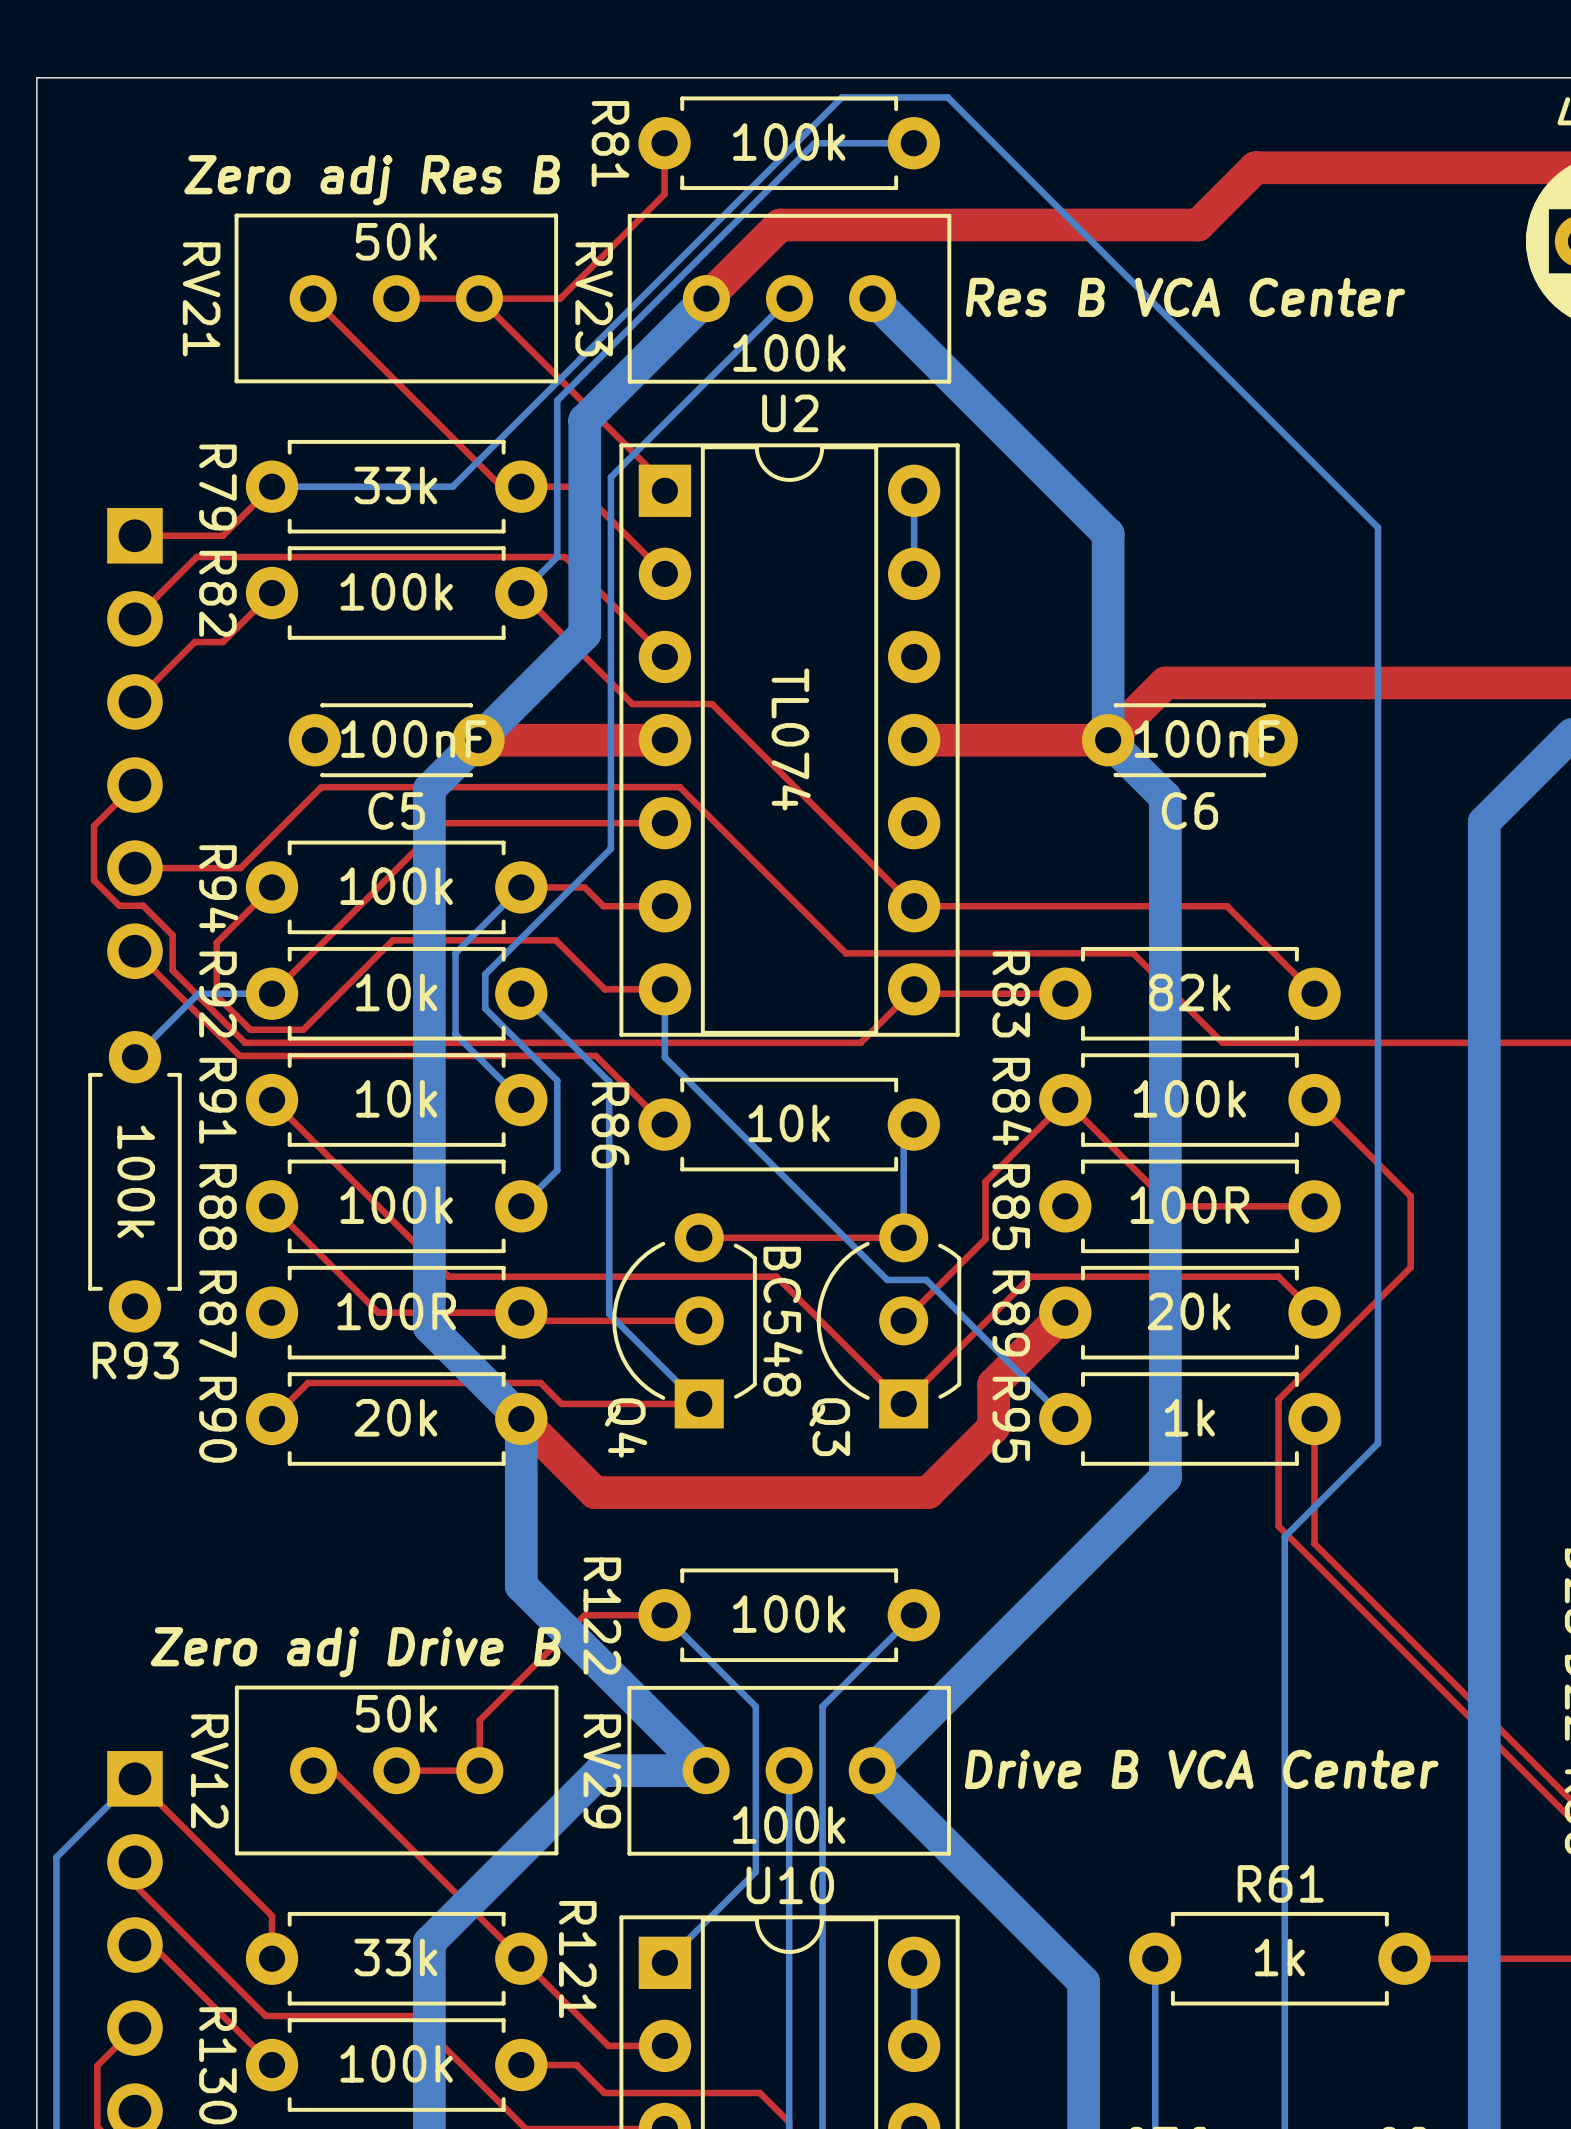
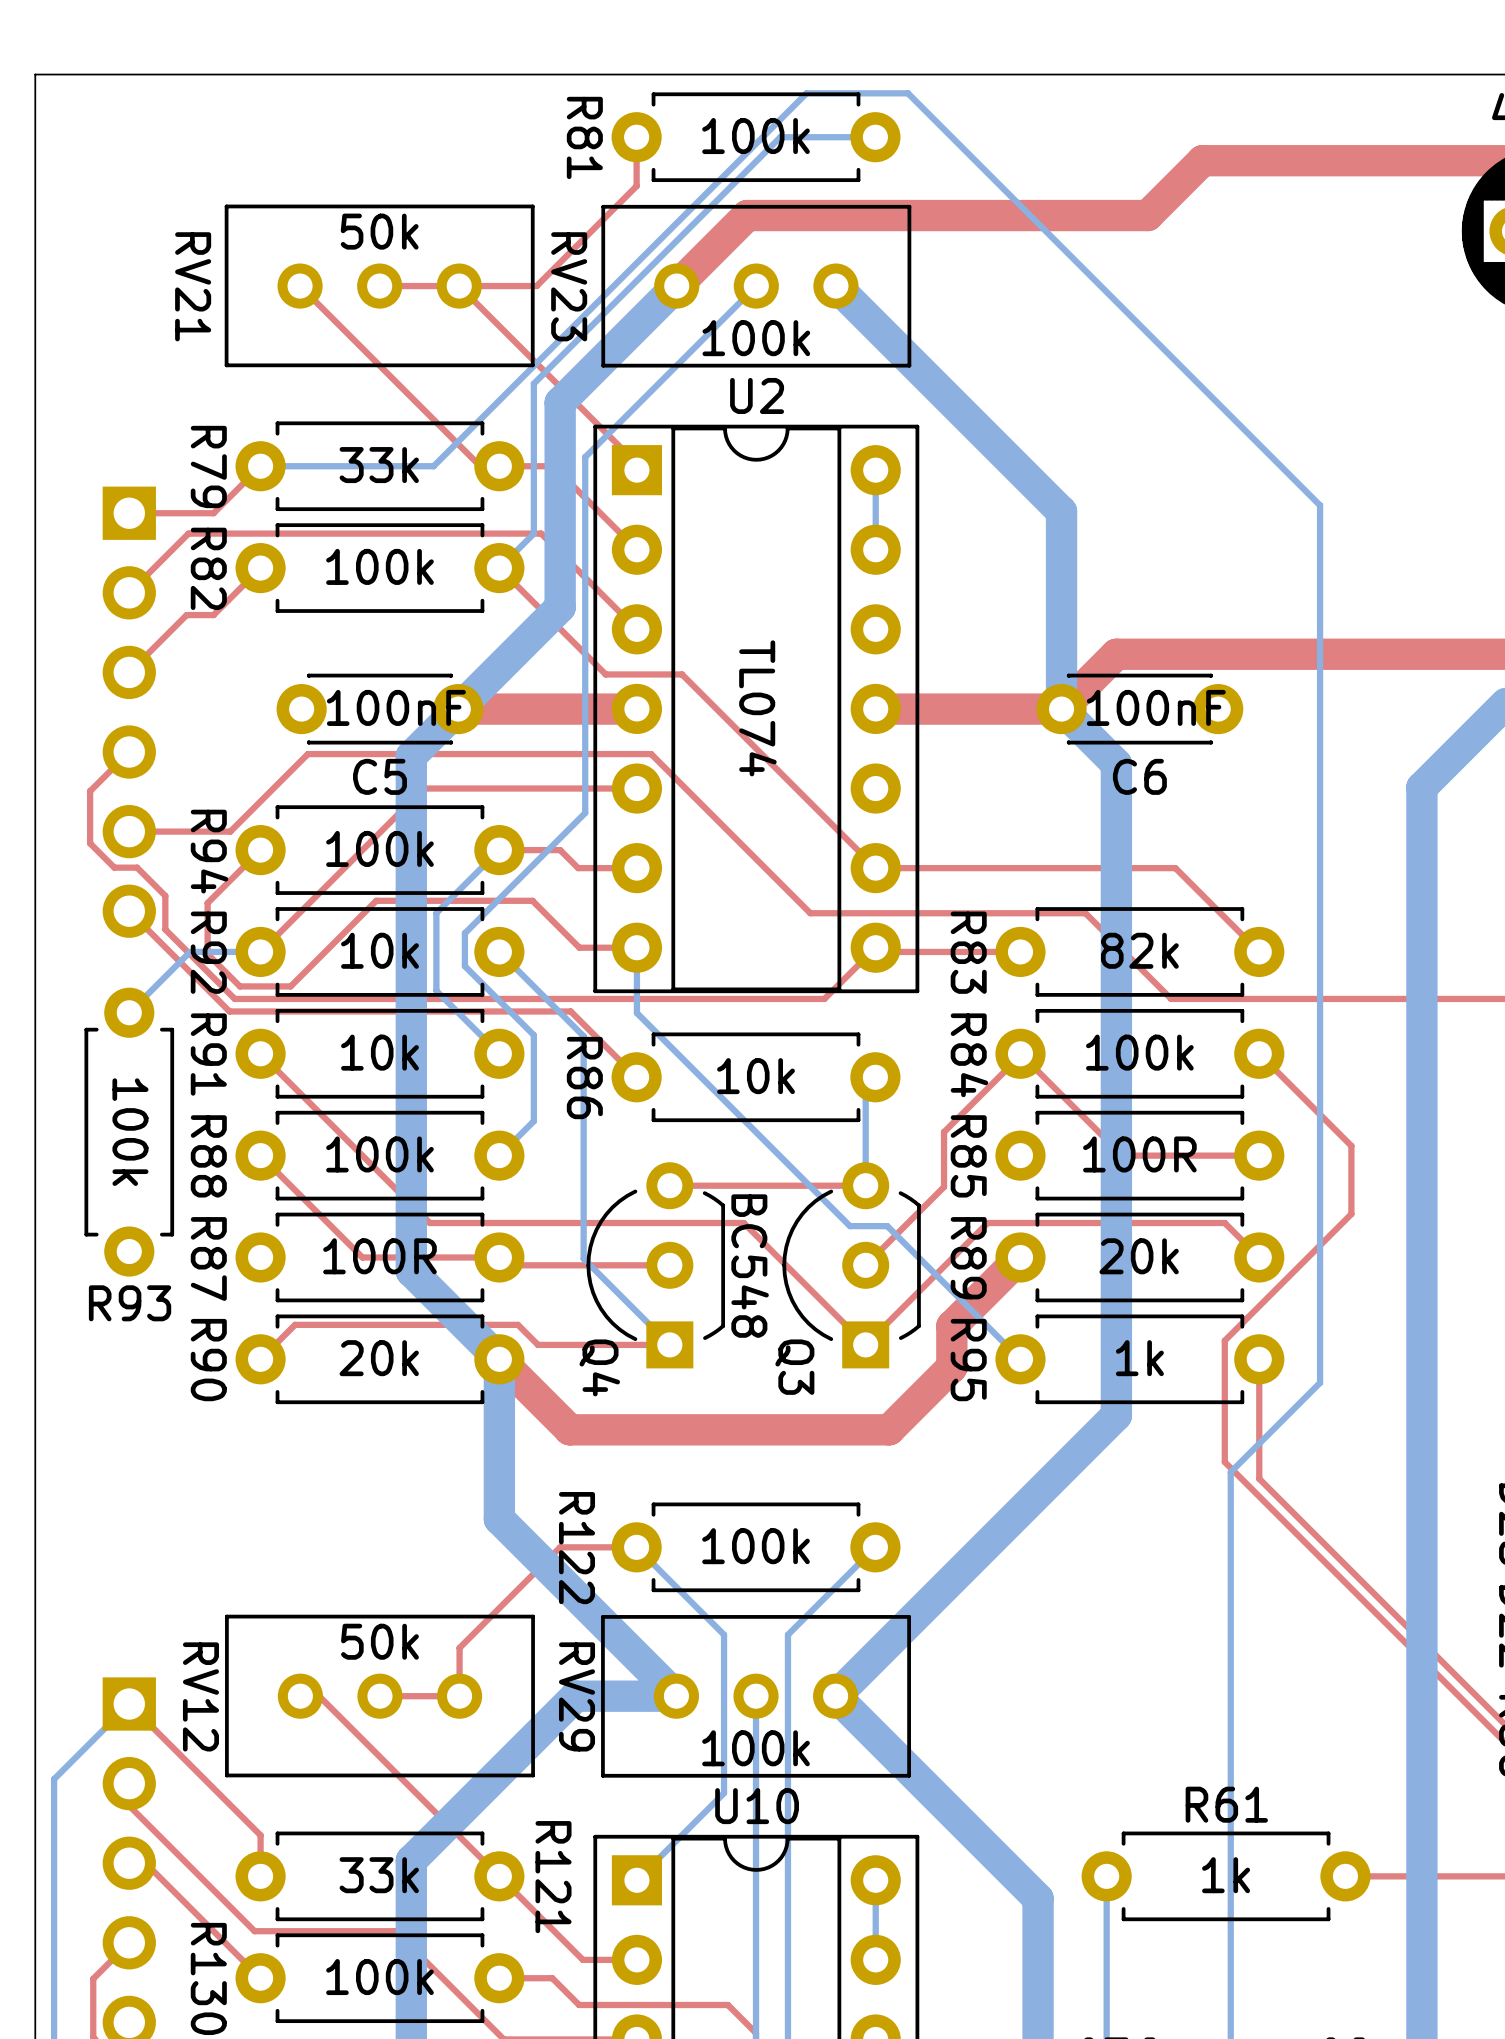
RV21 text: Zero adj Res B (372, 180) -> none
RV23 text: Res B VCA Center (1185, 297) -> none
RV12 text: Zero adj Drive B (355, 1652) -> none
RV29 text: Drive B VCA Center (1201, 1769) -> none

